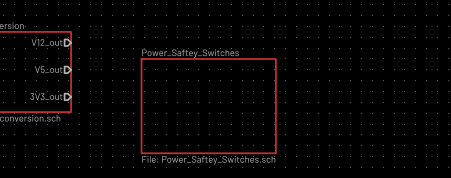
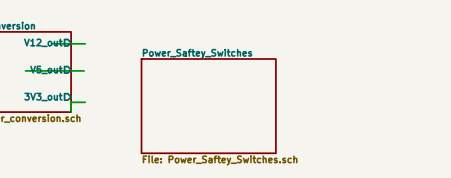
wire: none -> (51, 43) (85, 43)
wire: none -> (25, 70) (84, 70)
wire: none -> (85, 102) (71, 102) (71, 112)

